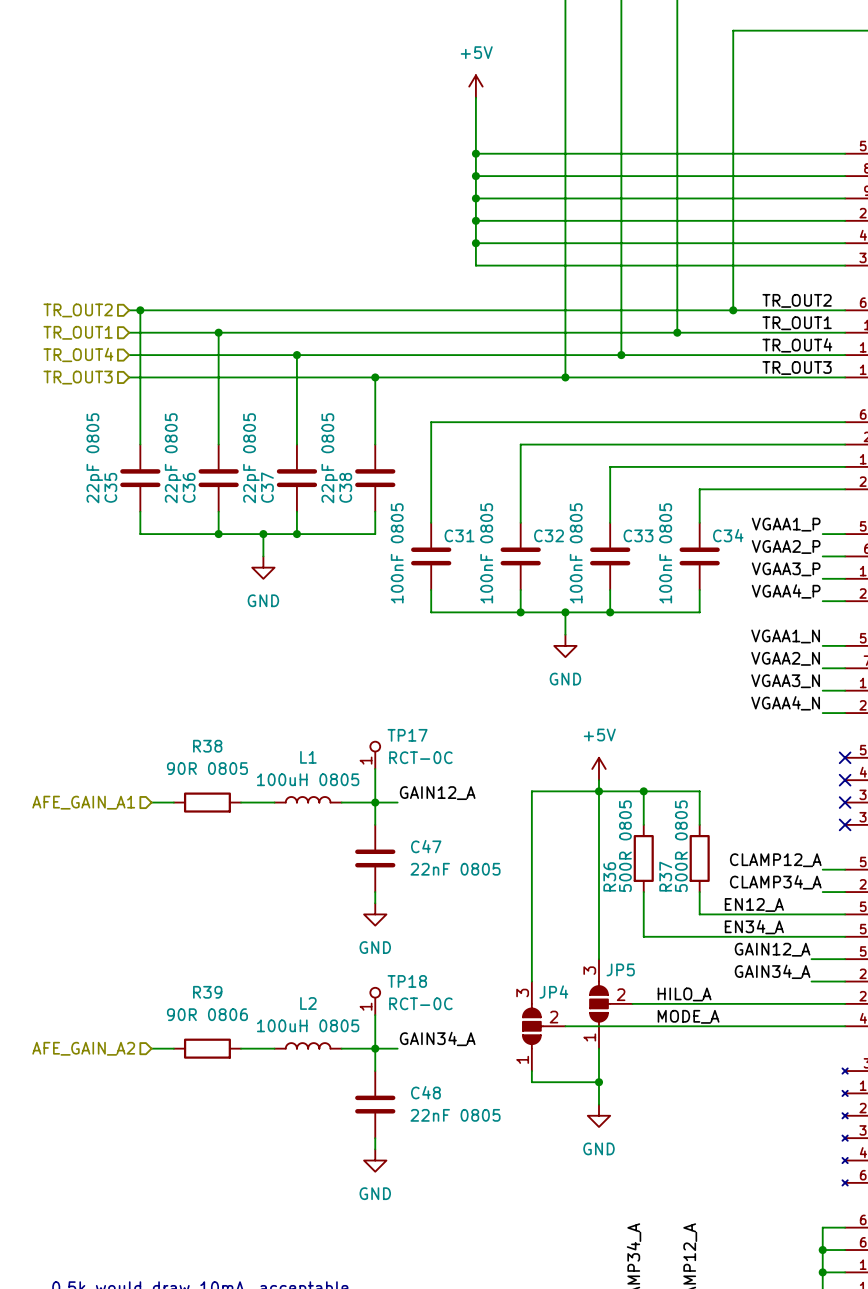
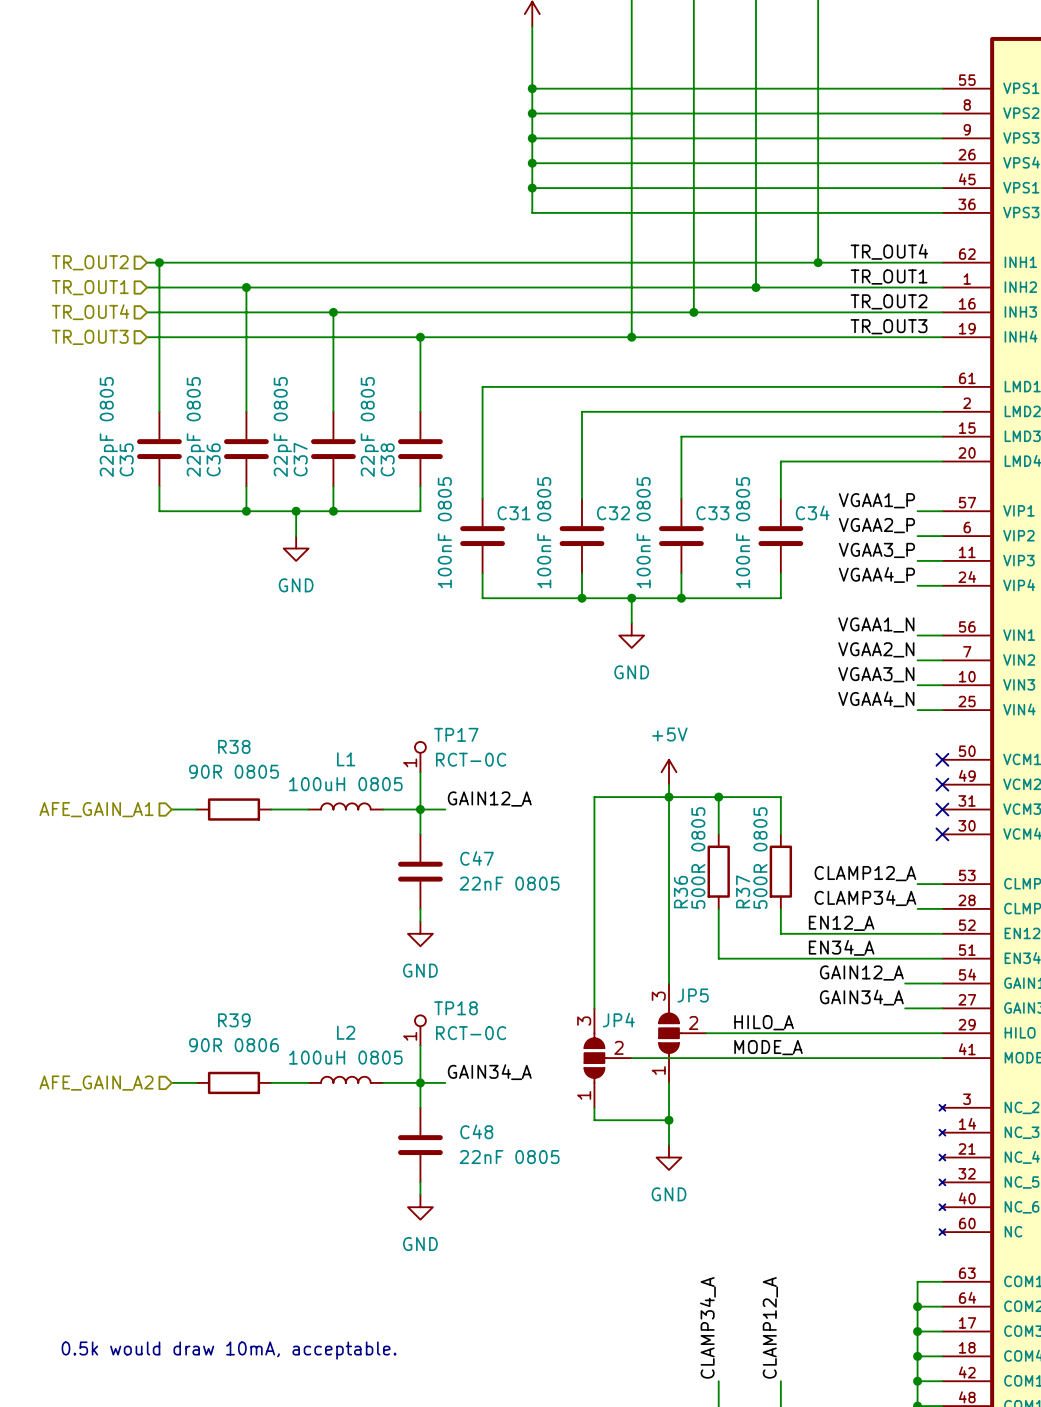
label: TR_OUT2 (797, 300) -> TR_OUT4 (889, 251)
label: TR_OUT4 (797, 345) -> TR_OUT2 (889, 301)

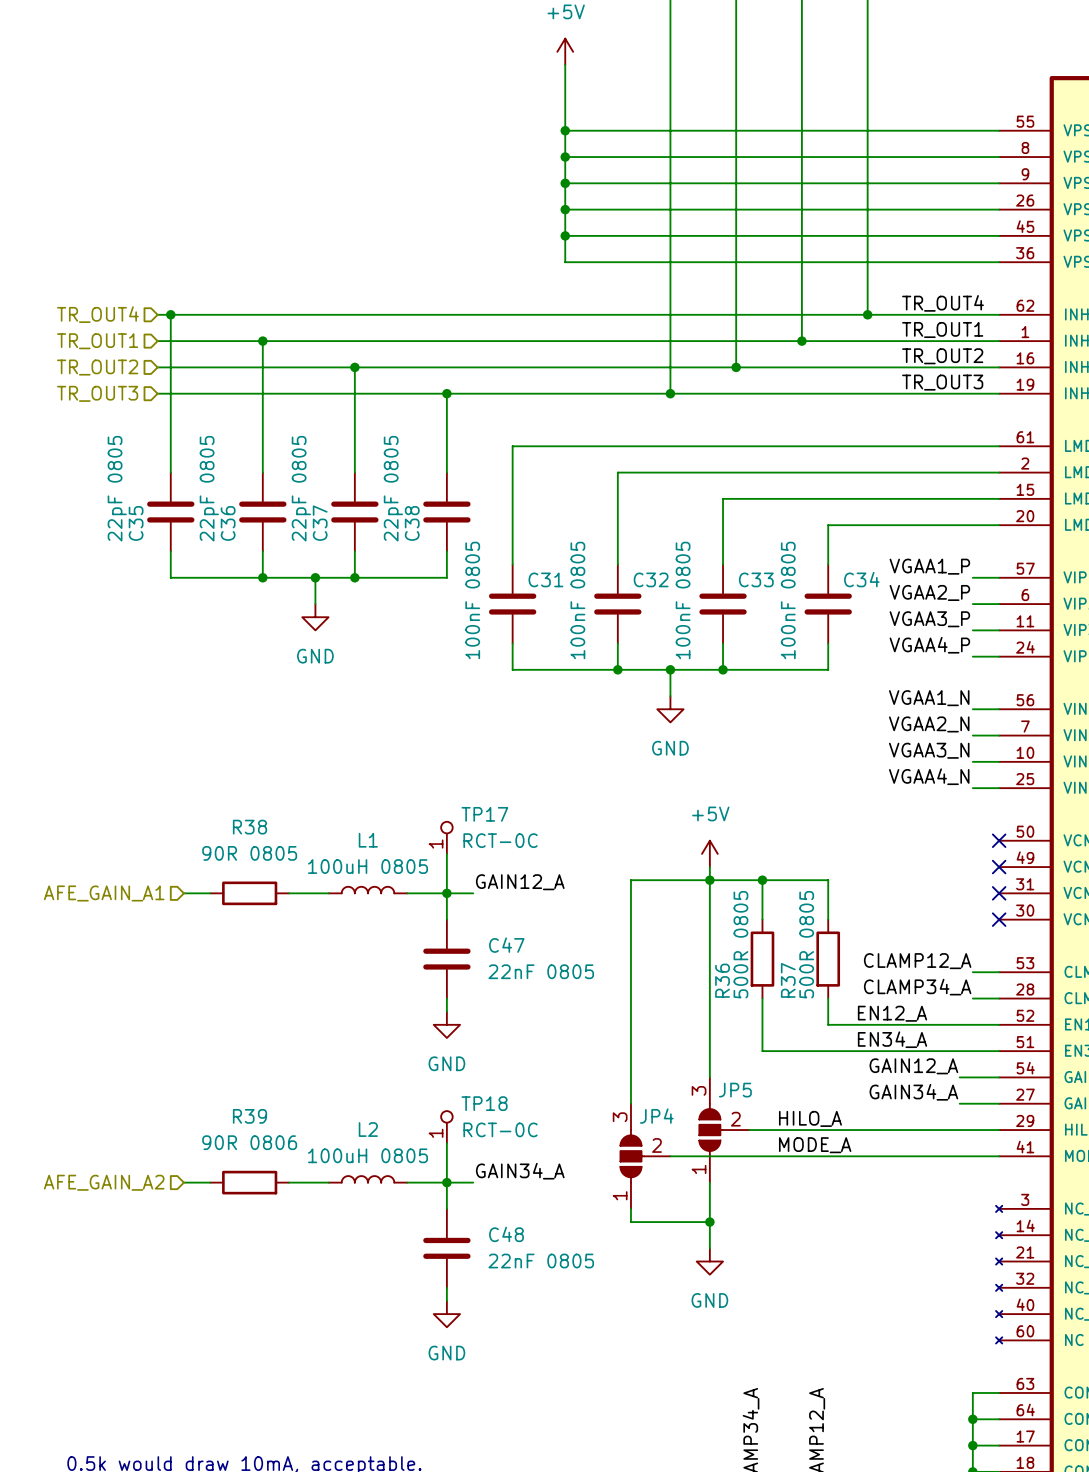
hierarchical label: TR_OUT2 (90, 262) -> TR_OUT4 (97, 314)
hierarchical label: TR_OUT4 (90, 312) -> TR_OUT2 (97, 367)

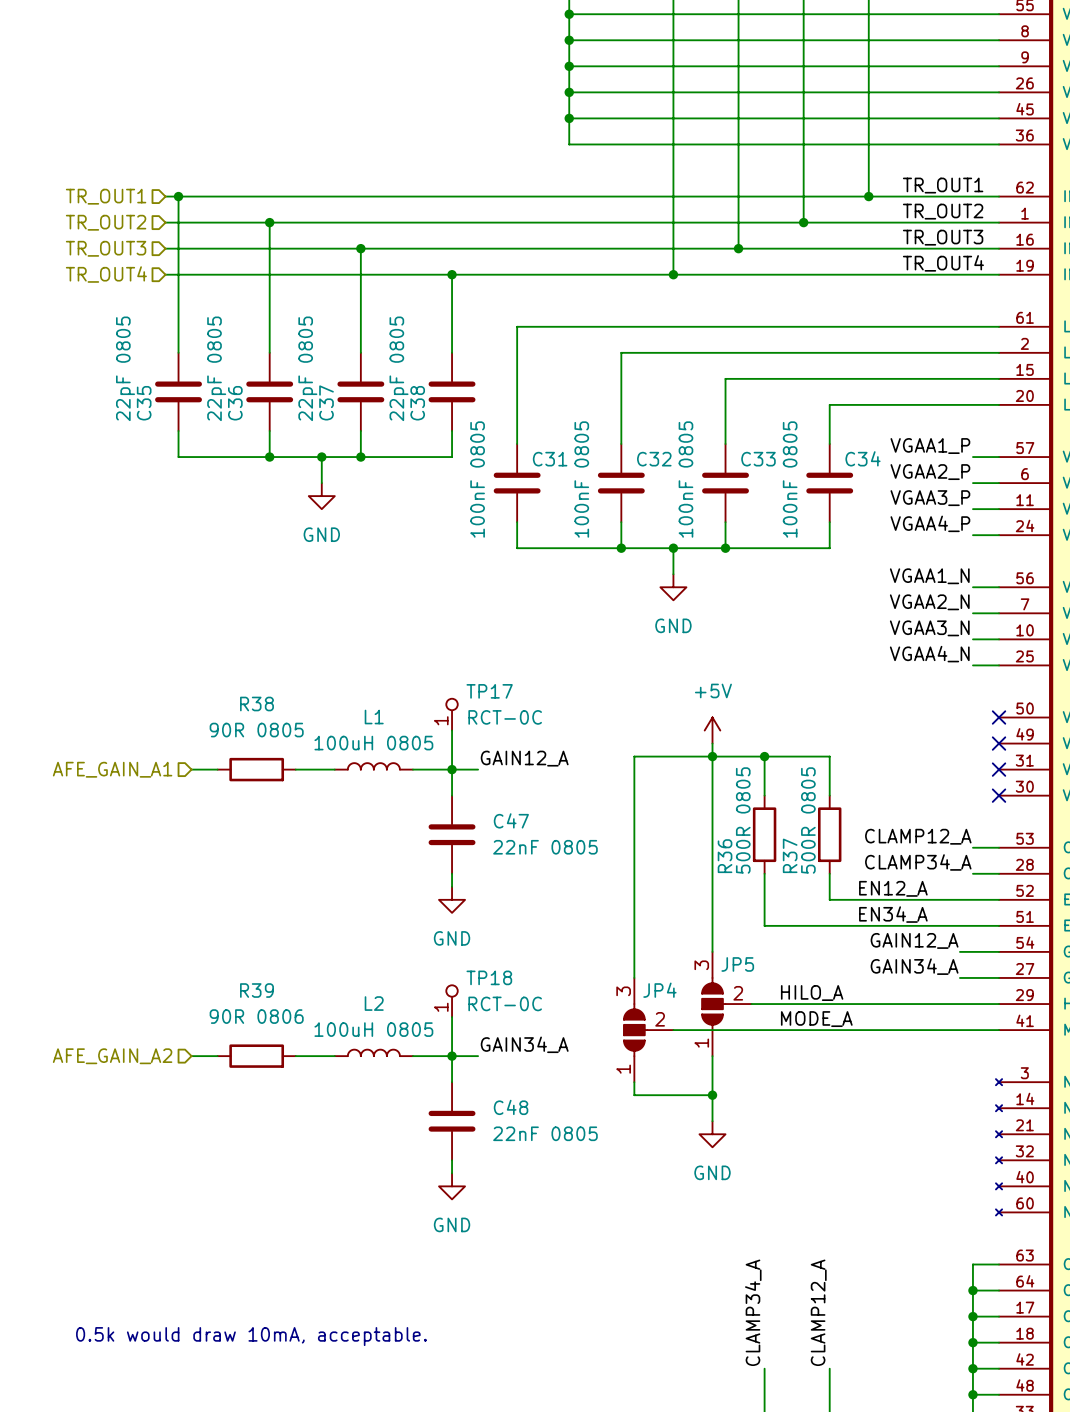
label: TR_OUT4 (943, 303) -> TR_OUT1 (943, 185)
hierarchical label: TR_OUT4 (97, 314) -> TR_OUT1 (106, 196)
label: TR_OUT1 (942, 329) -> TR_OUT2 (943, 211)
hierarchical label: TR_OUT1 (97, 341) -> TR_OUT2 (106, 222)
label: TR_OUT2 (942, 356) -> TR_OUT3 (943, 237)
hierarchical label: TR_OUT2 (97, 367) -> TR_OUT3 (106, 248)
label: TR_OUT3 (942, 382) -> TR_OUT4 (943, 263)
hierarchical label: TR_OUT3 (97, 393) -> TR_OUT4 (106, 274)

